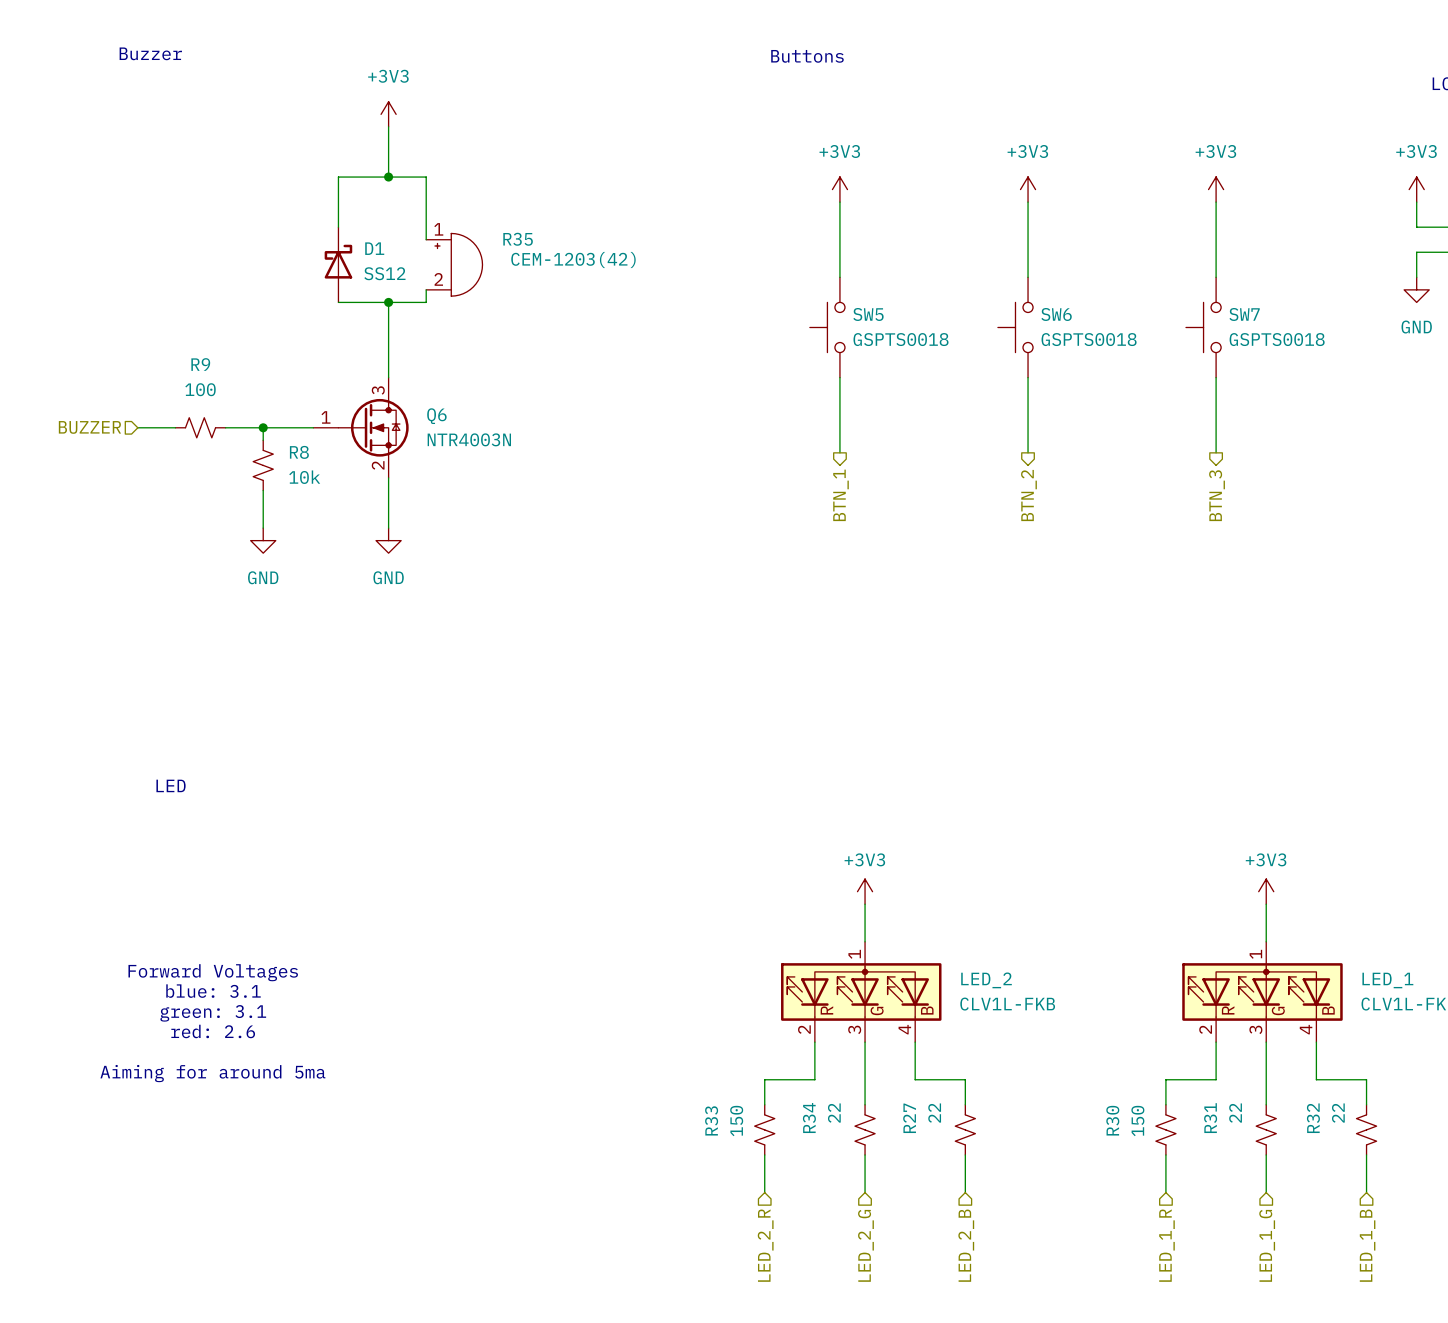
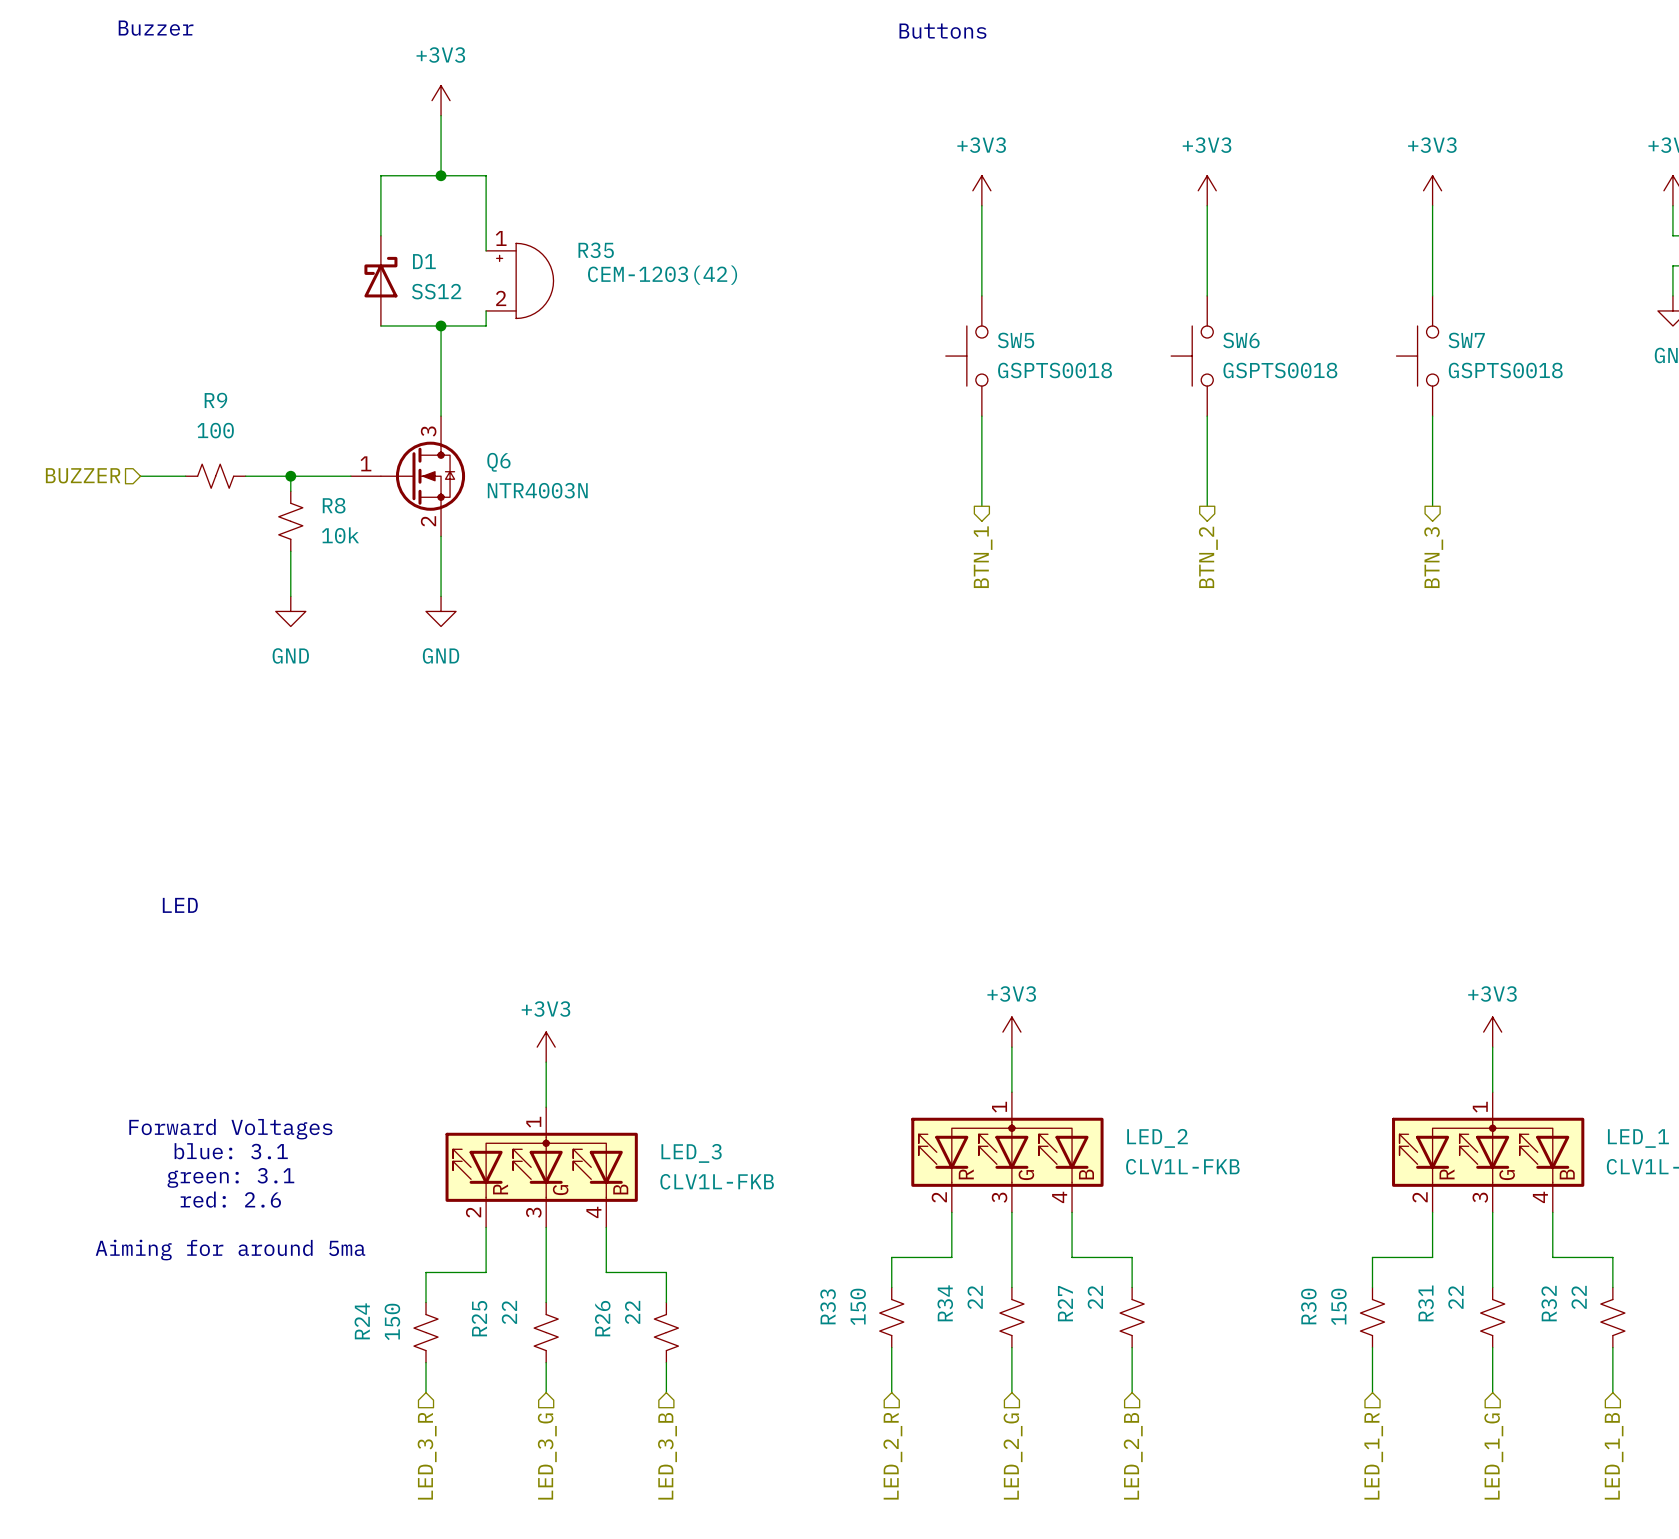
power symbol: none -> +3V3 (546, 1047)
wire: none -> (546, 1062) (546, 1107)
LED_3: none -> CLV1L-FKB (541, 1167)
wire: none -> (486, 1227) (486, 1272) (426, 1272) (426, 1302)
wire: none -> (546, 1227) (546, 1302)
wire: none -> (606, 1227) (606, 1272) (666, 1272) (666, 1302)
R24: none -> 150 (426, 1332)
R25: none -> 22 (546, 1332)
R26: none -> 22 (666, 1332)
wire: none -> (426, 1362) (426, 1392)
wire: none -> (546, 1362) (546, 1392)
wire: none -> (666, 1362) (666, 1392)
hierarchical label: none -> LED_3_R (427, 1456)
hierarchical label: none -> LED_3_G (547, 1456)
hierarchical label: none -> LED_3_B (667, 1456)

